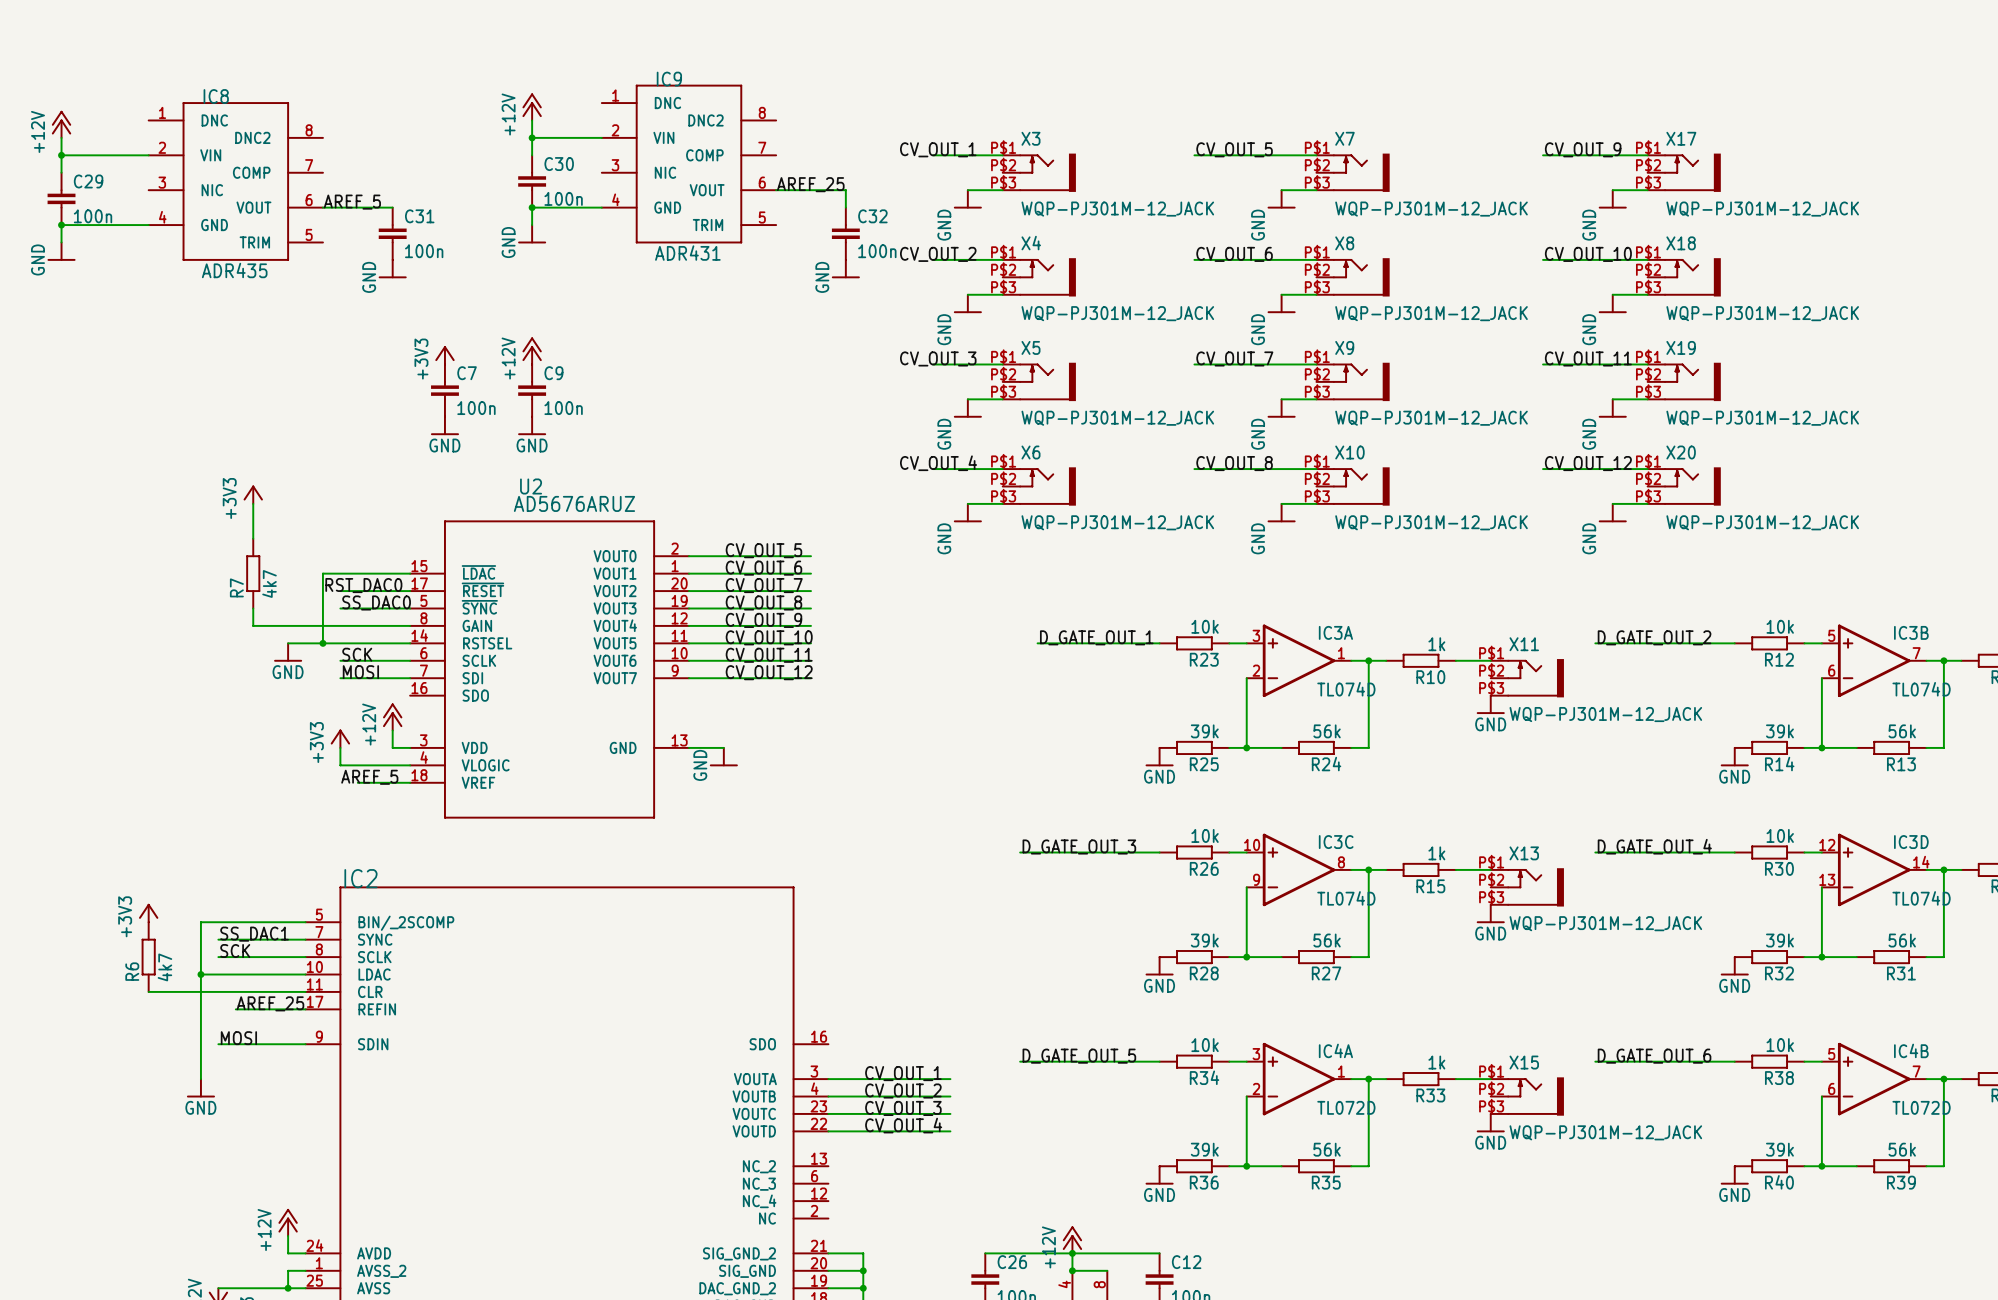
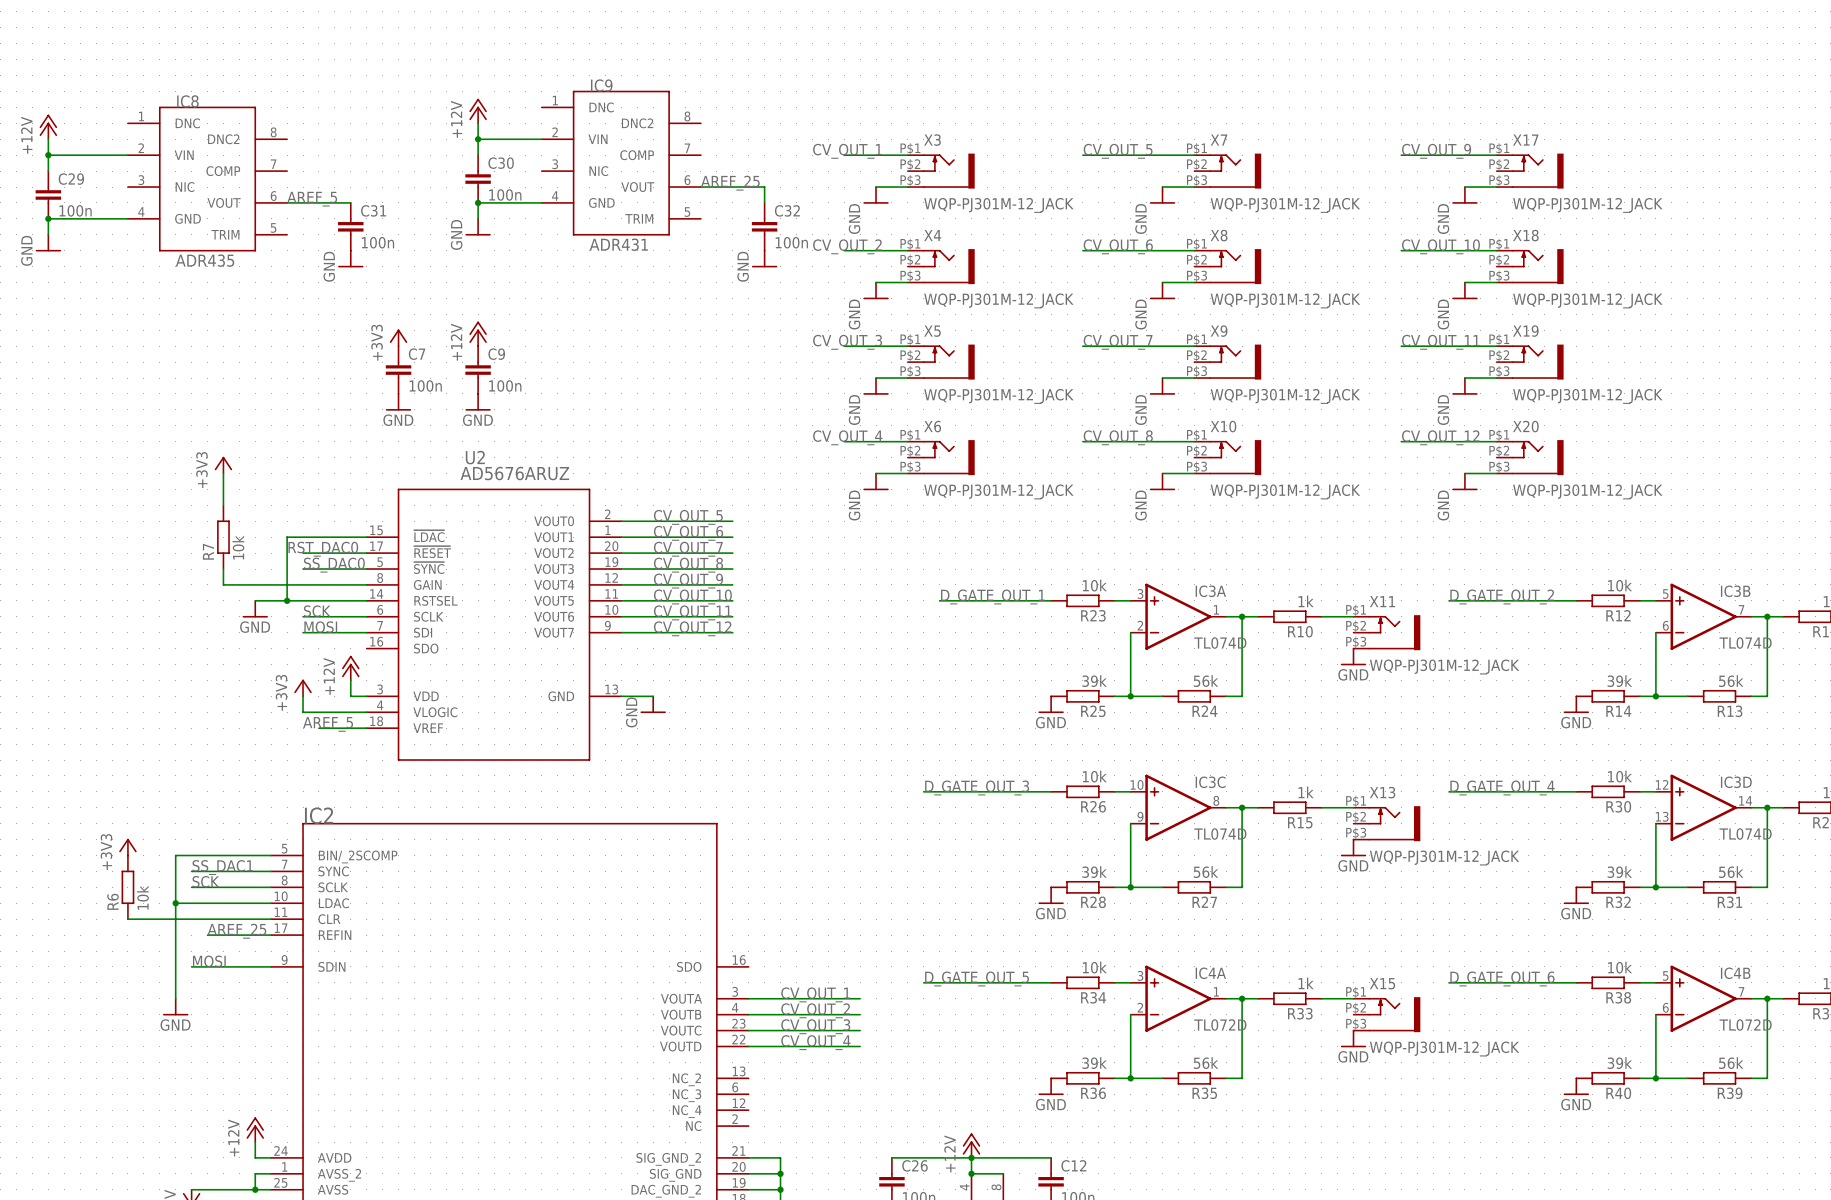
R7 value: 4k7 (269, 583) -> 10k (238, 547)
R6 value: 4k7 (164, 967) -> 10k (142, 897)

